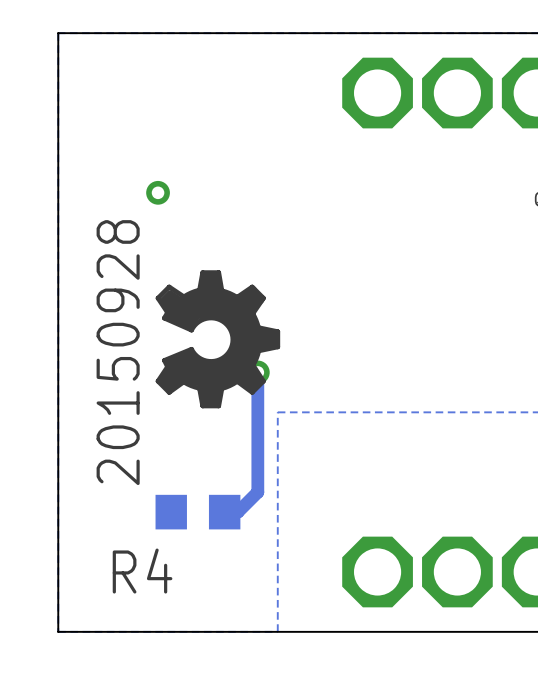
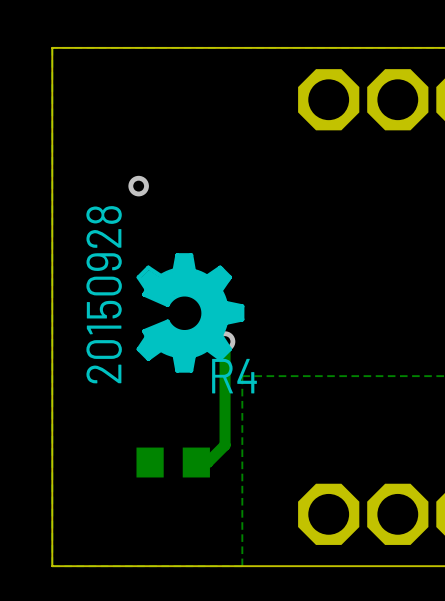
R4 name position: R4 (142, 571) -> R4 (234, 376)

